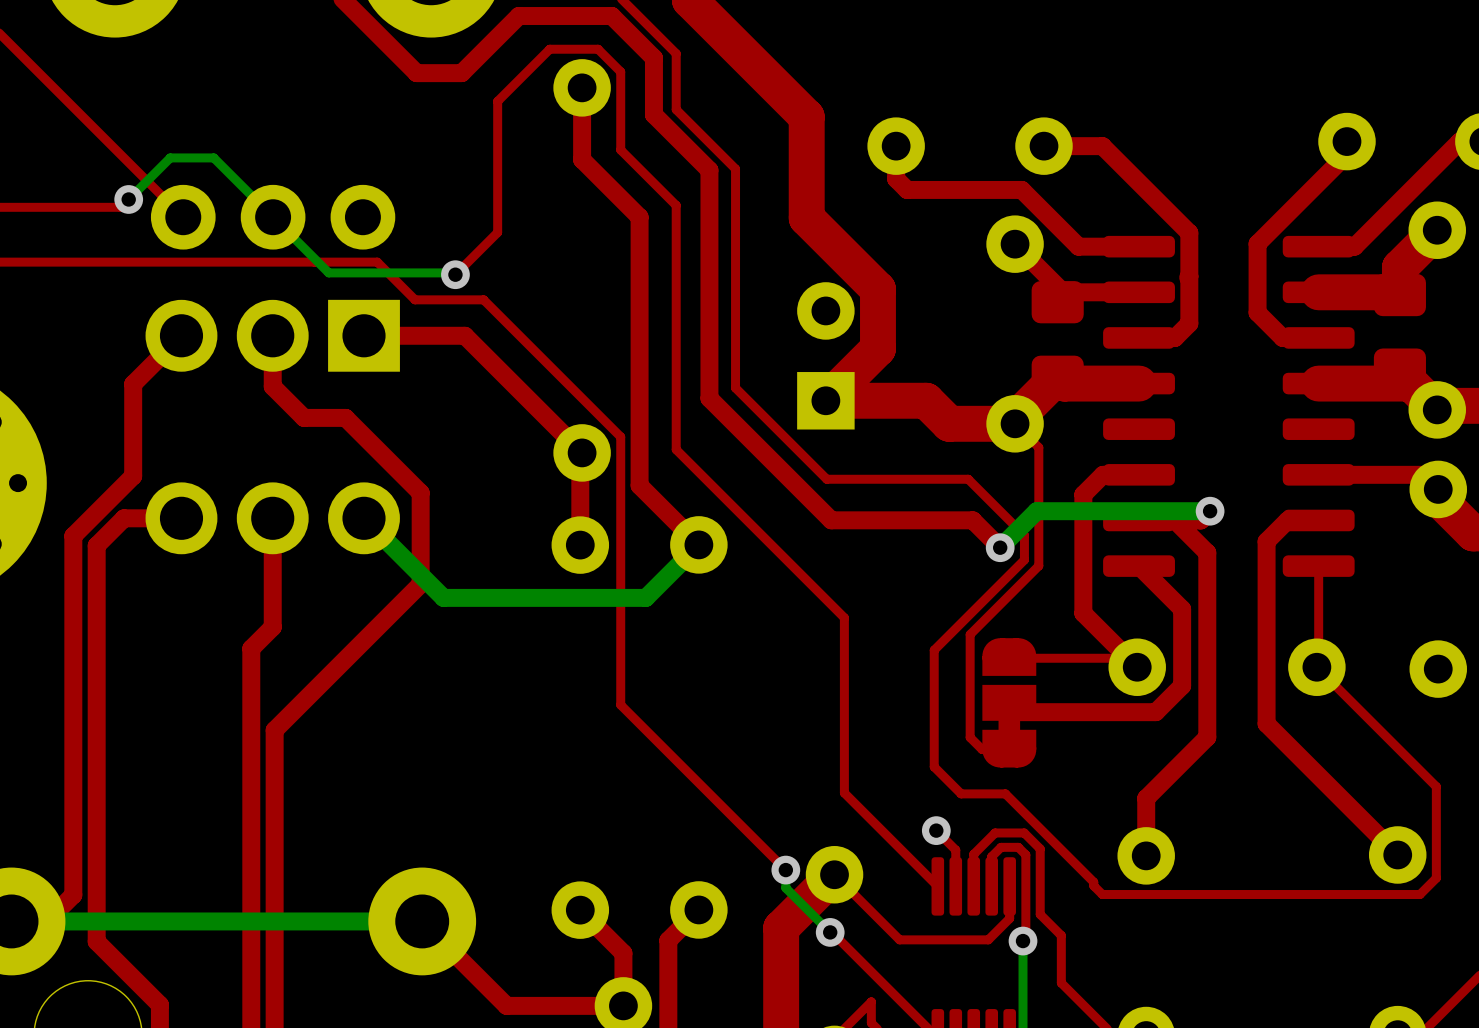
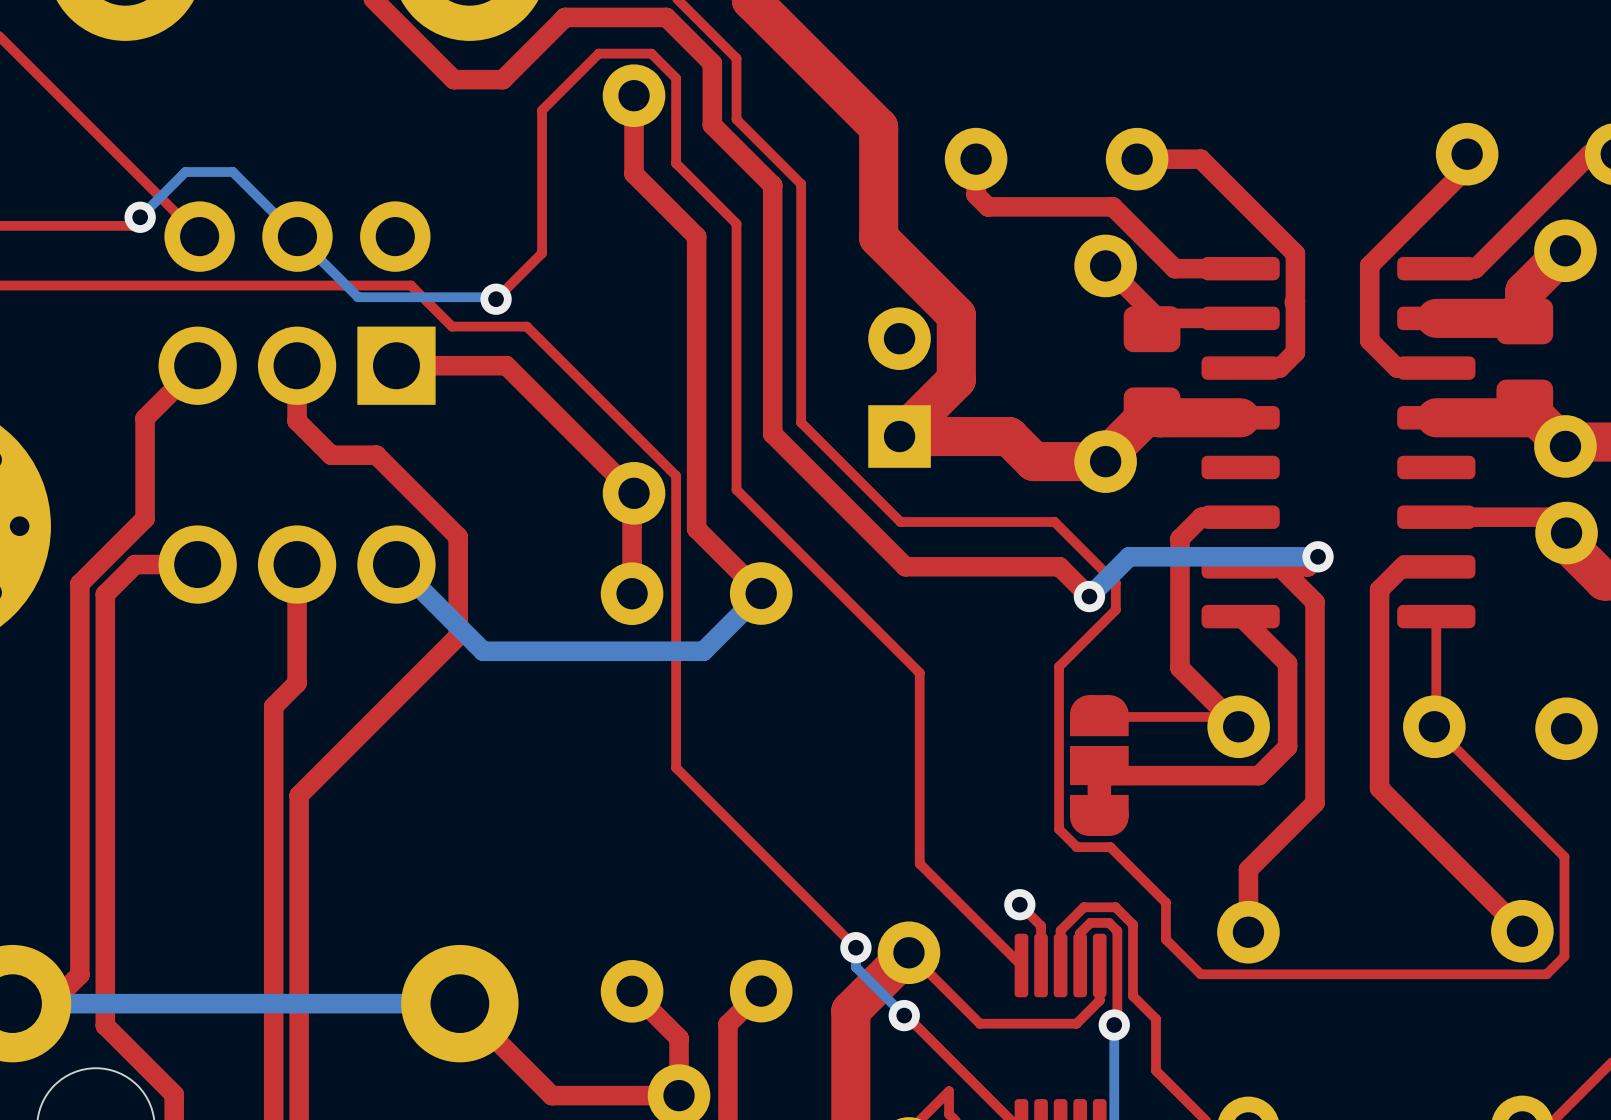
top track: (1015, 423) (1038, 447) (1038, 565) (970, 634) (970, 737) (982, 749) (1009, 749) -> none
top track: (972, 612) (934, 650) (934, 766) (961, 793) (1005, 793) (1093, 882) (1093, 885) -> (1059, 666) (1059, 829) (1076, 847) (1110, 847) (1165, 902) (1165, 939) (1191, 964)

